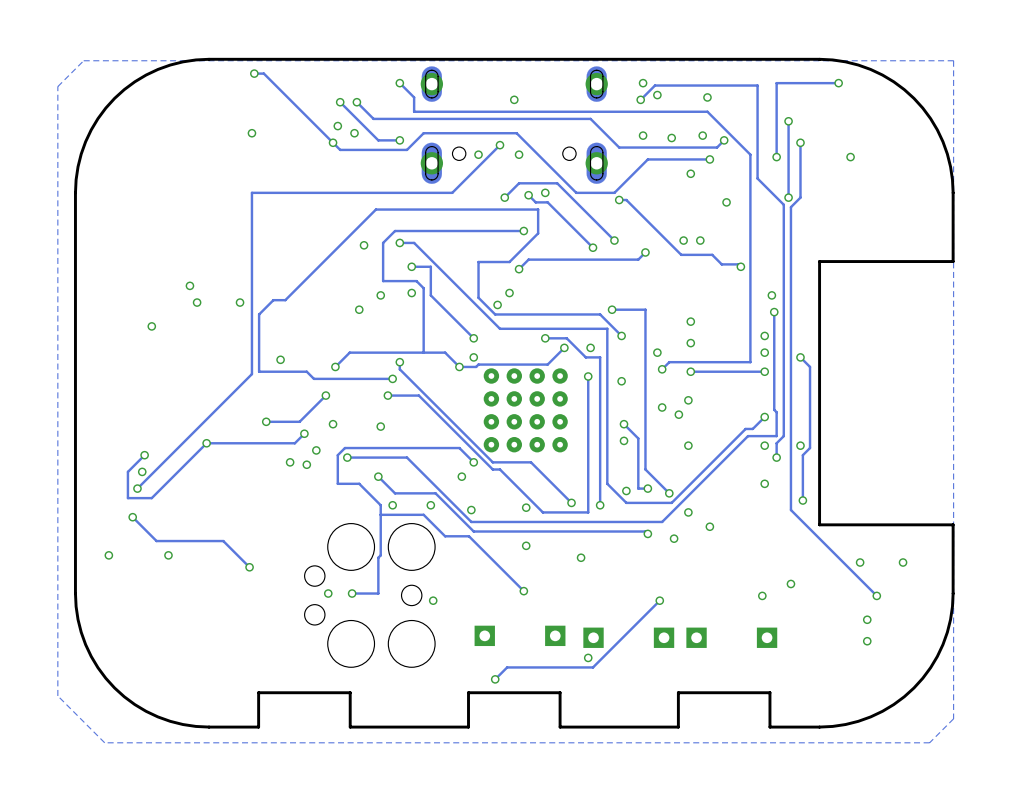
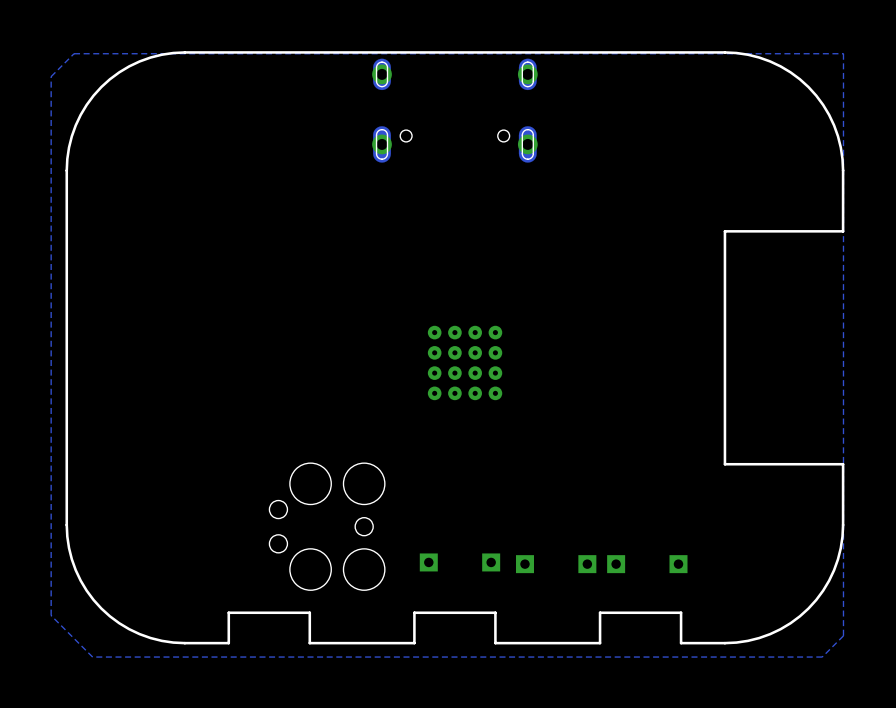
track: (254, 73) (263, 73) (340, 149) (406, 149) (423, 133) (516, 133) (576, 192) (614, 192) (647, 159) (709, 159) -> none
via: (254, 73) -> none
track: (399, 83) (414, 97) (414, 111) (707, 111) (750, 154) (750, 362) (669, 362) (662, 369) -> none
via: (399, 83) -> none
via: (643, 83) -> none
track: (838, 83) (776, 83) (776, 157) -> none
via: (838, 83) -> none
via: (657, 95) -> none
via: (707, 97) -> none
via: (514, 99) -> none
track: (640, 99) (655, 85) (757, 85) (757, 178) (783, 204) (783, 436) (776, 443) (776, 457) -> none
via: (640, 99) -> none
track: (340, 102) (378, 140) (399, 140) -> none
via: (340, 102) -> none
track: (356, 102) (373, 118) (590, 118) (619, 147) (717, 147) (724, 140) -> none
via: (356, 102) -> none
track: (788, 121) (788, 197) -> none
via: (788, 121) -> none
via: (337, 126) -> none
via: (251, 133) -> none
via: (354, 133) -> none
via: (643, 135) -> none
via: (702, 135) -> none
via: (671, 137) -> none
via: (399, 140) -> none
via: (724, 140) -> none
via: (333, 142) -> none
track: (800, 142) (800, 197) (790, 207) (790, 510) (876, 595) -> none
via: (800, 142) -> none
track: (499, 145) (452, 192) (251, 192) (251, 374) (137, 488) -> none
via: (499, 145) -> none
via: (478, 154) -> none
via: (519, 154) -> none
via: (776, 157) -> none
via: (850, 157) -> none
via: (709, 159) -> none
via: (690, 173) -> none
via: (545, 192) -> none
track: (528, 195) (535, 202) (547, 202) (593, 247) -> none
via: (528, 195) -> none
track: (504, 197) (519, 183) (557, 183) (614, 240) -> none
via: (504, 197) -> none
via: (788, 197) -> none
track: (619, 200) (626, 200) (681, 254) (712, 254) (721, 264) (738, 264) (740, 266) -> none
via: (619, 200) -> none
via: (726, 202) -> none
track: (523, 231) (395, 231) (383, 242) (383, 281) (416, 281) (423, 288) (423, 352) -> none
via: (523, 231) -> none
via: (614, 240) -> none
via: (683, 240) -> none
via: (700, 240) -> none
track: (399, 242) (414, 242) (499, 328) (607, 328) (607, 483) (626, 502) (671, 502) (745, 428) (752, 428) (764, 417) -> none
via: (399, 242) -> none
via: (364, 245) -> none
via: (593, 247) -> none
track: (645, 252) (638, 259) (528, 259) (519, 269) -> none
via: (645, 252) -> none
track: (411, 266) (430, 266) (430, 295) (473, 338) -> none
via: (411, 266) -> none
via: (740, 266) -> none
via: (519, 269) -> none
via: (189, 285) -> none
via: (411, 293) -> none
via: (509, 293) -> none
via: (380, 295) -> none
via: (771, 295) -> none
via: (197, 302) -> none
via: (240, 302) -> none
via: (497, 304) -> none
via: (359, 309) -> none
track: (612, 309) (645, 309) (645, 469) (669, 493) -> none
via: (612, 309) -> none
track: (774, 312) (774, 409) (776, 412) (776, 436) (748, 436) (662, 521) (471, 521) (406, 457) (347, 457) -> none
via: (774, 312) -> none
via: (690, 321) -> none
via: (151, 326) -> none
track: (621, 335) (600, 314) (495, 314) (478, 297) (478, 262) (509, 262) (538, 233) (538, 209) (375, 209) (285, 300) (273, 300) (259, 314) (259, 371) (306, 371) (313, 378) (392, 378) -> none
via: (621, 335) -> none
via: (764, 335) -> none
via: (473, 338) -> none
track: (545, 338) (566, 338) (585, 357) (600, 357) (600, 505) -> none
via: (545, 338) -> none
via: (690, 343) -> none
track: (564, 347) (547, 364) (478, 364) (476, 366) (459, 366) (445, 352) (349, 352) (335, 366) -> none
via: (564, 347) -> none
via: (590, 347) -> none
via: (657, 352) -> none
via: (764, 352) -> none
via: (473, 357) -> none
track: (800, 357) (810, 366) (810, 448) (802, 455) (802, 500) -> none
via: (800, 357) -> none
via: (280, 359) -> none
track: (399, 362) (399, 369) (492, 462) (530, 462) (571, 502) -> none
via: (399, 362) -> none
via: (335, 366) -> none
via: (459, 366) -> none
via: (662, 369) -> none
via: (690, 371) -> none
track: (764, 371) (690, 371) -> none
via: (764, 371) -> none
track: (588, 376) (588, 512) (542, 512) (499, 469) (492, 469) (418, 395) (387, 395) -> none
via: (588, 376) -> none
via: (392, 378) -> none
via: (621, 381) -> none
track: (325, 395) (299, 421) (266, 421) -> none
via: (325, 395) -> none
via: (387, 395) -> none
via: (688, 400) -> none
via: (662, 407) -> none
via: (678, 414) -> none
via: (764, 417) -> none
via: (266, 421) -> none
via: (333, 424) -> none
track: (624, 424) (638, 438) (638, 488) (647, 488) -> none
via: (624, 424) -> none
via: (380, 426) -> none
track: (304, 433) (294, 443) (206, 443) (151, 498) (127, 498) (127, 471) (144, 455) -> none
via: (304, 433) -> none
via: (624, 440) -> none
via: (206, 443) -> none
via: (688, 445) -> none
via: (764, 445) -> none
via: (800, 445) -> none
via: (316, 450) -> none
via: (144, 455) -> none
via: (347, 457) -> none
via: (776, 457) -> none
via: (290, 462) -> none
track: (473, 462) (459, 448) (344, 448) (337, 455) (337, 483) (359, 483) (380, 505) (378, 593) (352, 593) -> none
via: (473, 462) -> none
via: (306, 464) -> none
via: (142, 471) -> none
track: (378, 476) (395, 493) (435, 493) (473, 531) (645, 531) (647, 533) -> none
via: (378, 476) -> none
via: (461, 476) -> none
via: (764, 483) -> none
via: (137, 488) -> none
via: (647, 488) -> none
via: (626, 490) -> none
via: (669, 493) -> none
via: (802, 500) -> none
via: (571, 502) -> none
via: (392, 505) -> none
via: (430, 505) -> none
via: (600, 505) -> none
via: (526, 507) -> none
via: (471, 510) -> none
via: (688, 512) -> none
track: (380, 514) (423, 514) (445, 536) (468, 536) (523, 591) -> none
track: (132, 517) (156, 541) (223, 541) (249, 567) -> none
via: (132, 517) -> none
via: (709, 526) -> none
via: (647, 533) -> none
via: (674, 538) -> none
via: (526, 545) -> none
via: (108, 555) -> none
via: (168, 555) -> none
via: (581, 557) -> none
via: (860, 562) -> none
via: (903, 562) -> none
via: (249, 567) -> none
via: (790, 583) -> none
via: (523, 591) -> none
via: (328, 593) -> none
via: (352, 593) -> none
via: (762, 595) -> none
via: (876, 595) -> none
via: (433, 600) -> none
track: (659, 600) (593, 667) (507, 667) (495, 679) -> none
via: (659, 600) -> none
via: (867, 619) -> none
via: (867, 641) -> none
via: (588, 657) -> none
via: (495, 679) -> none

